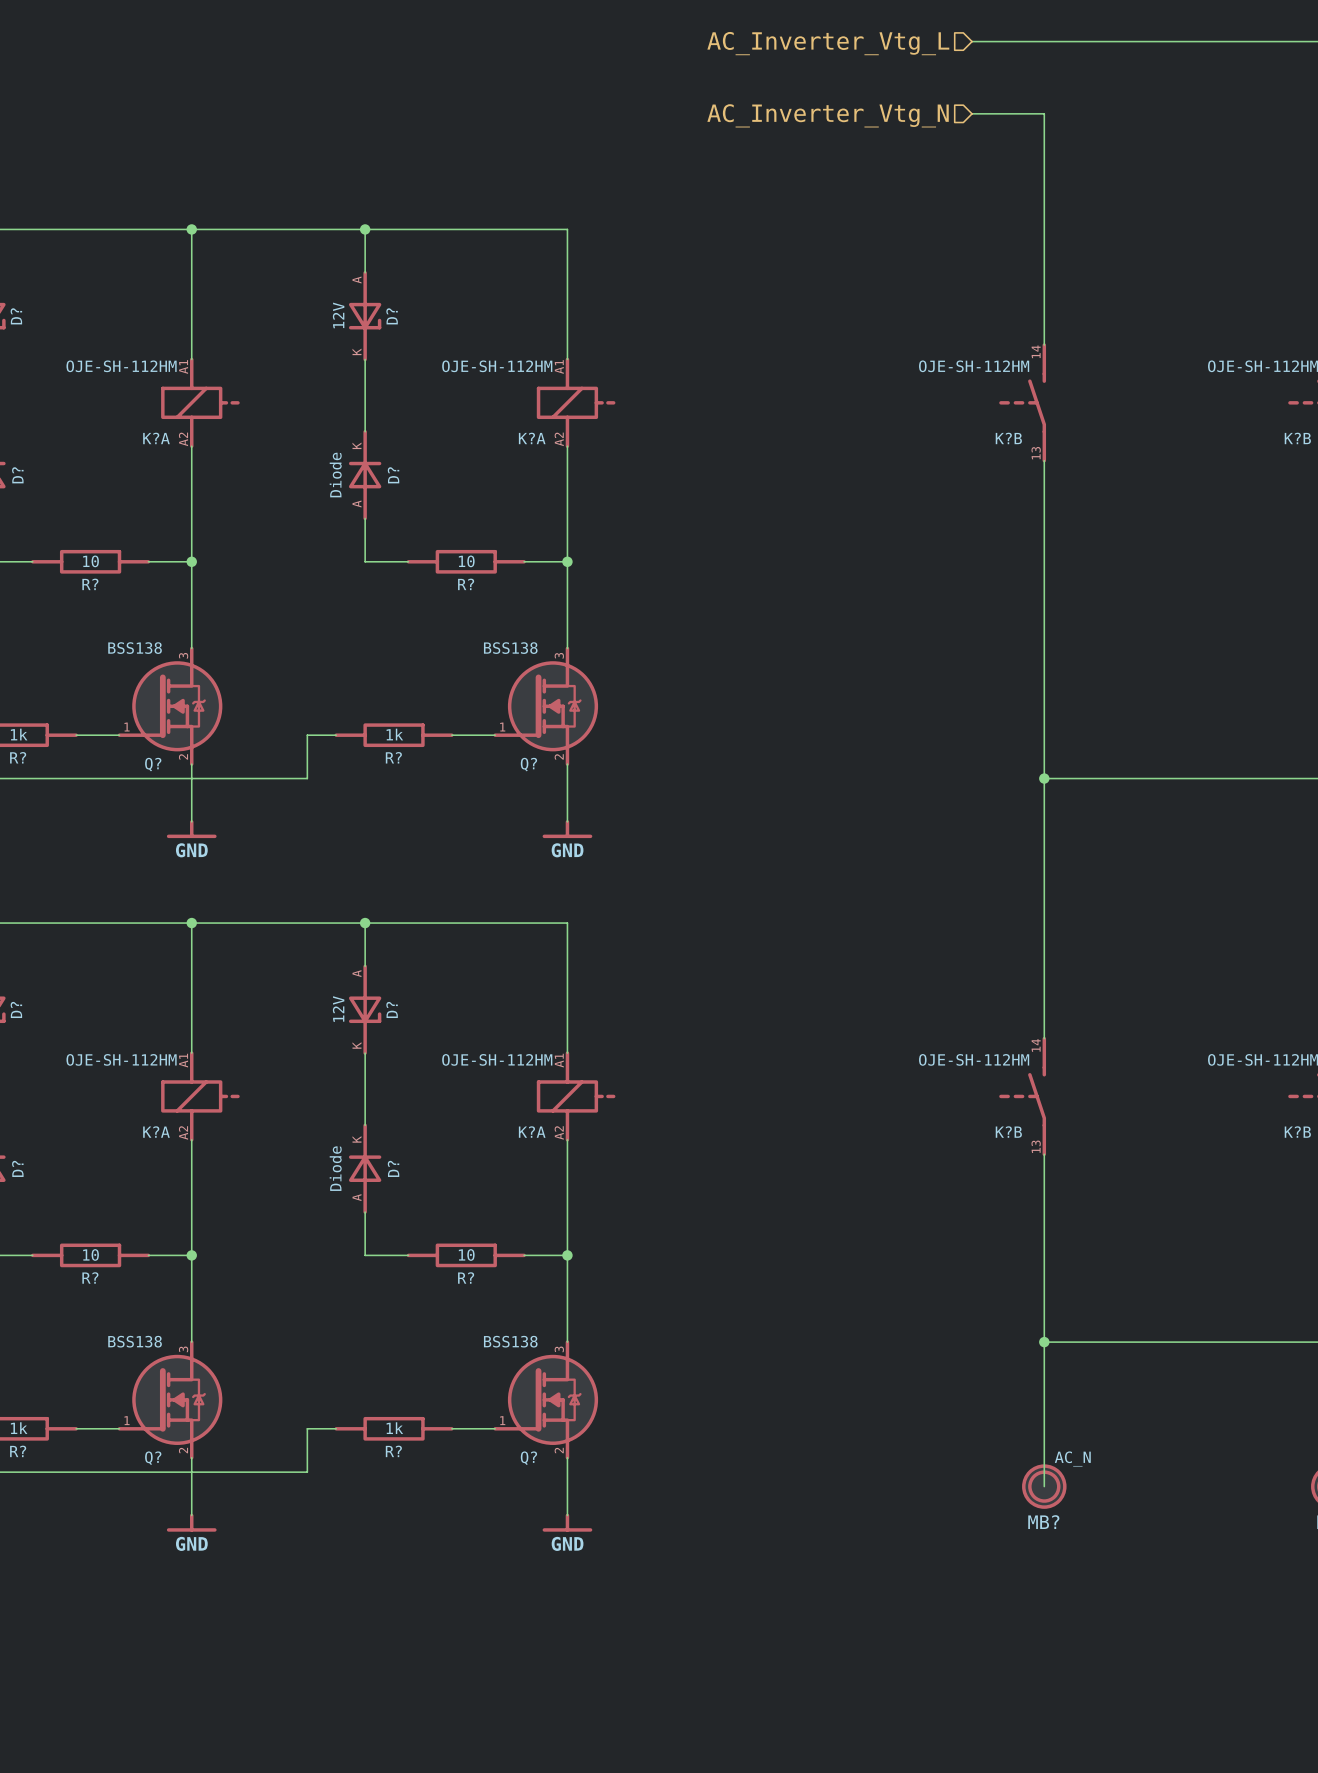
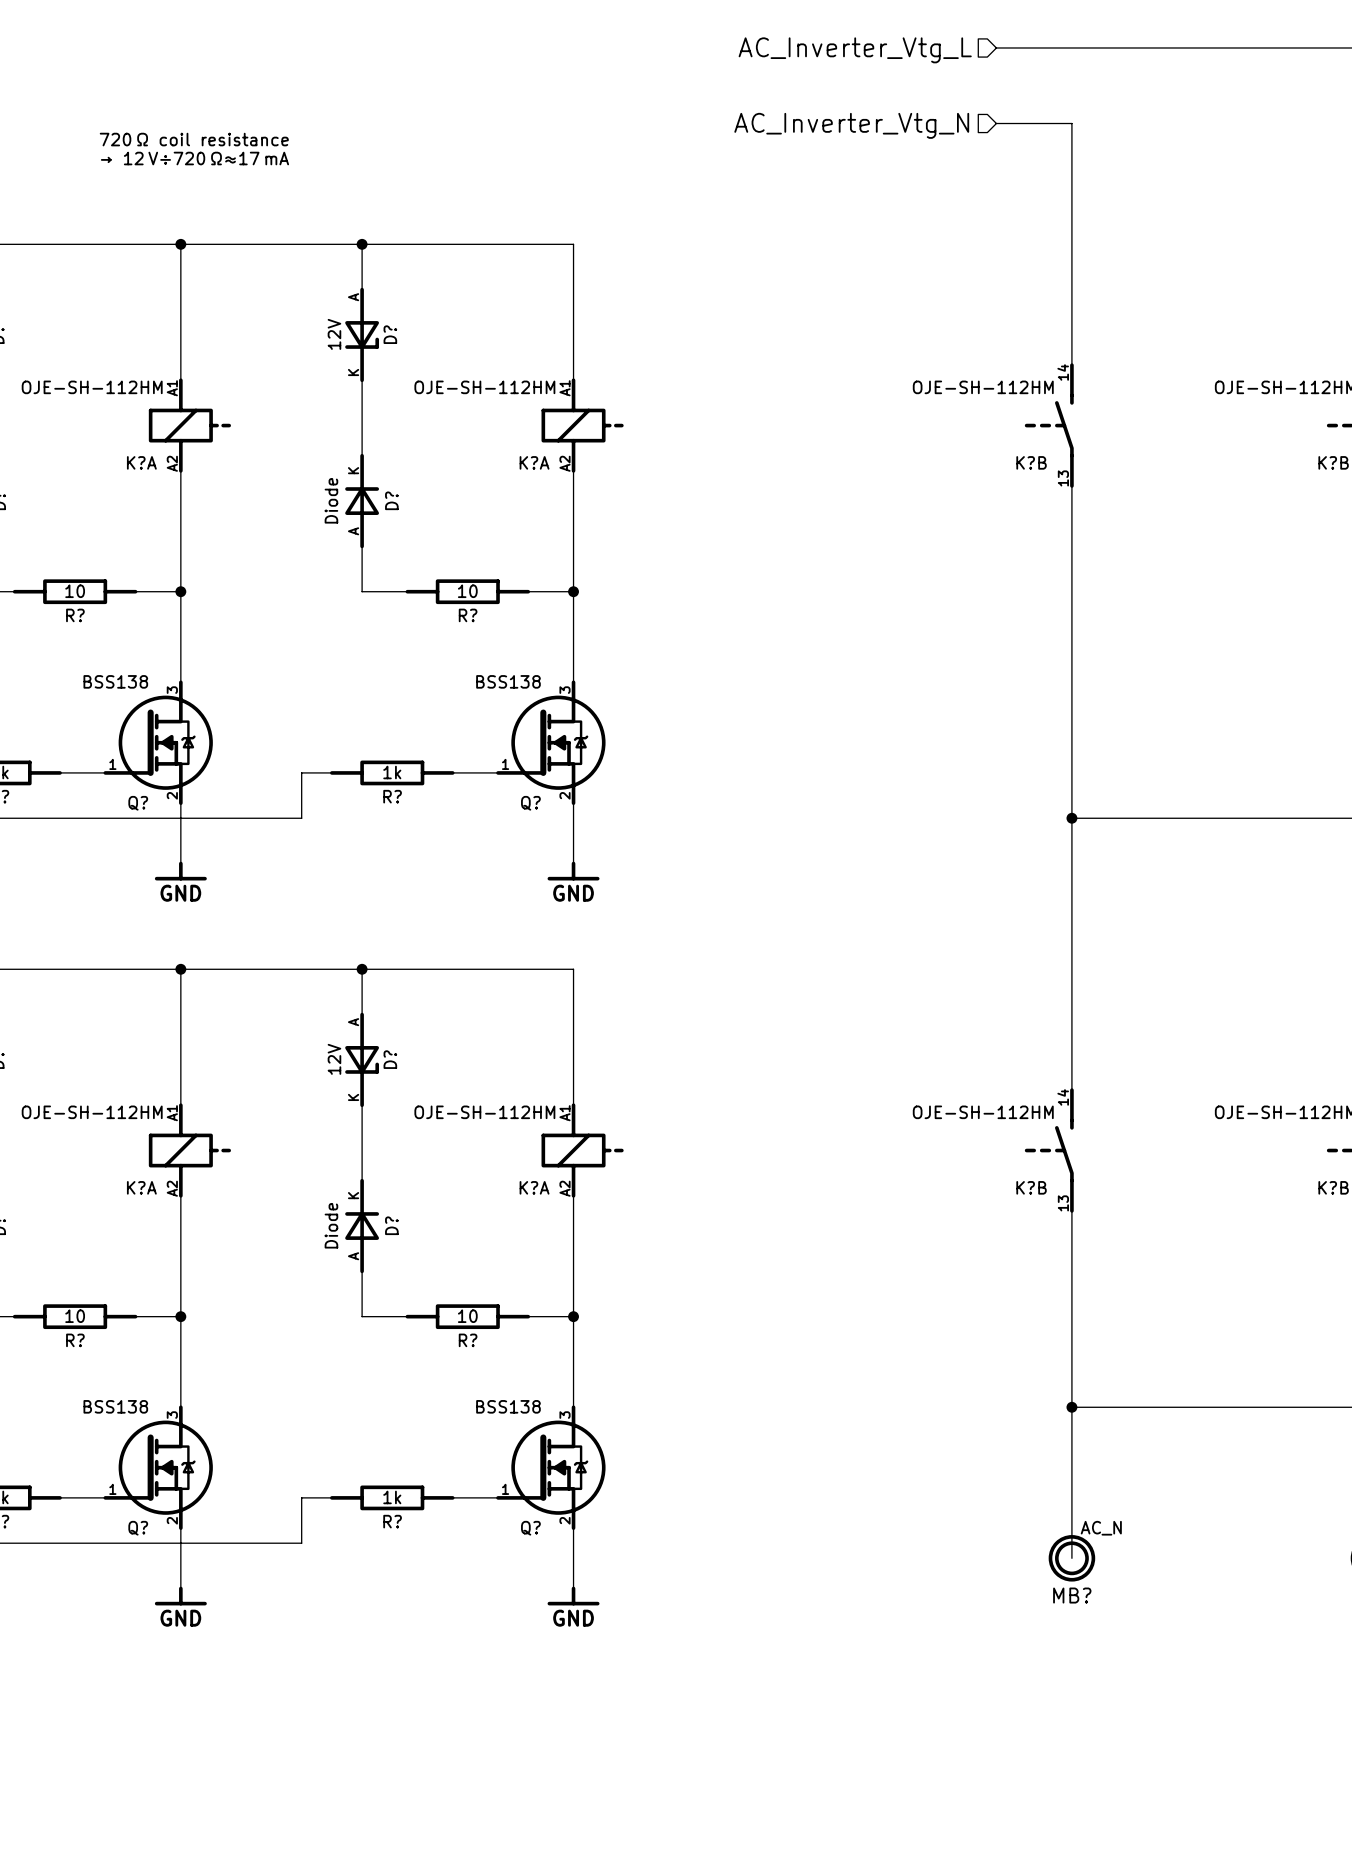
text: none -> 720 Ω coil resistance (194, 139)
text: none -> → 12 V÷720 Ω≈17 mA (194, 158)

